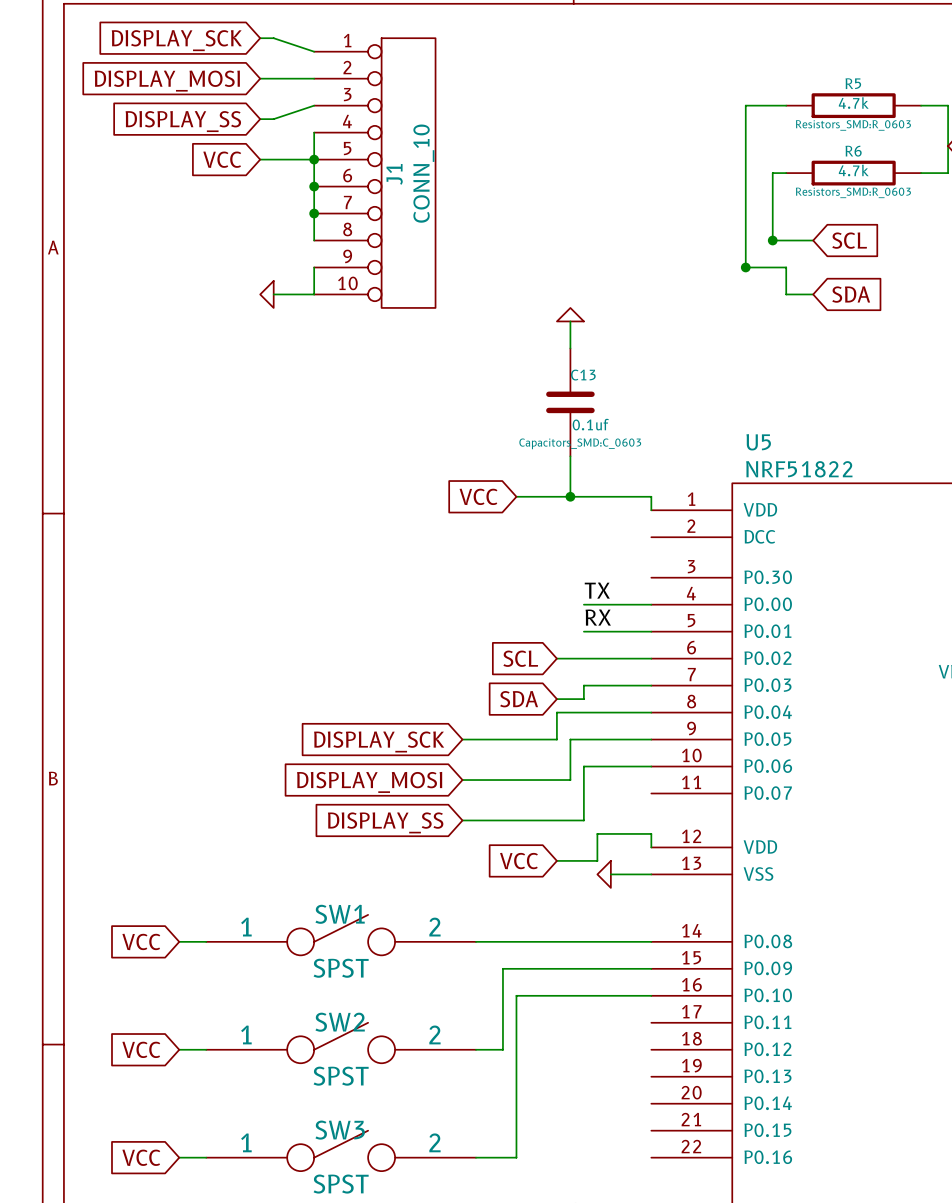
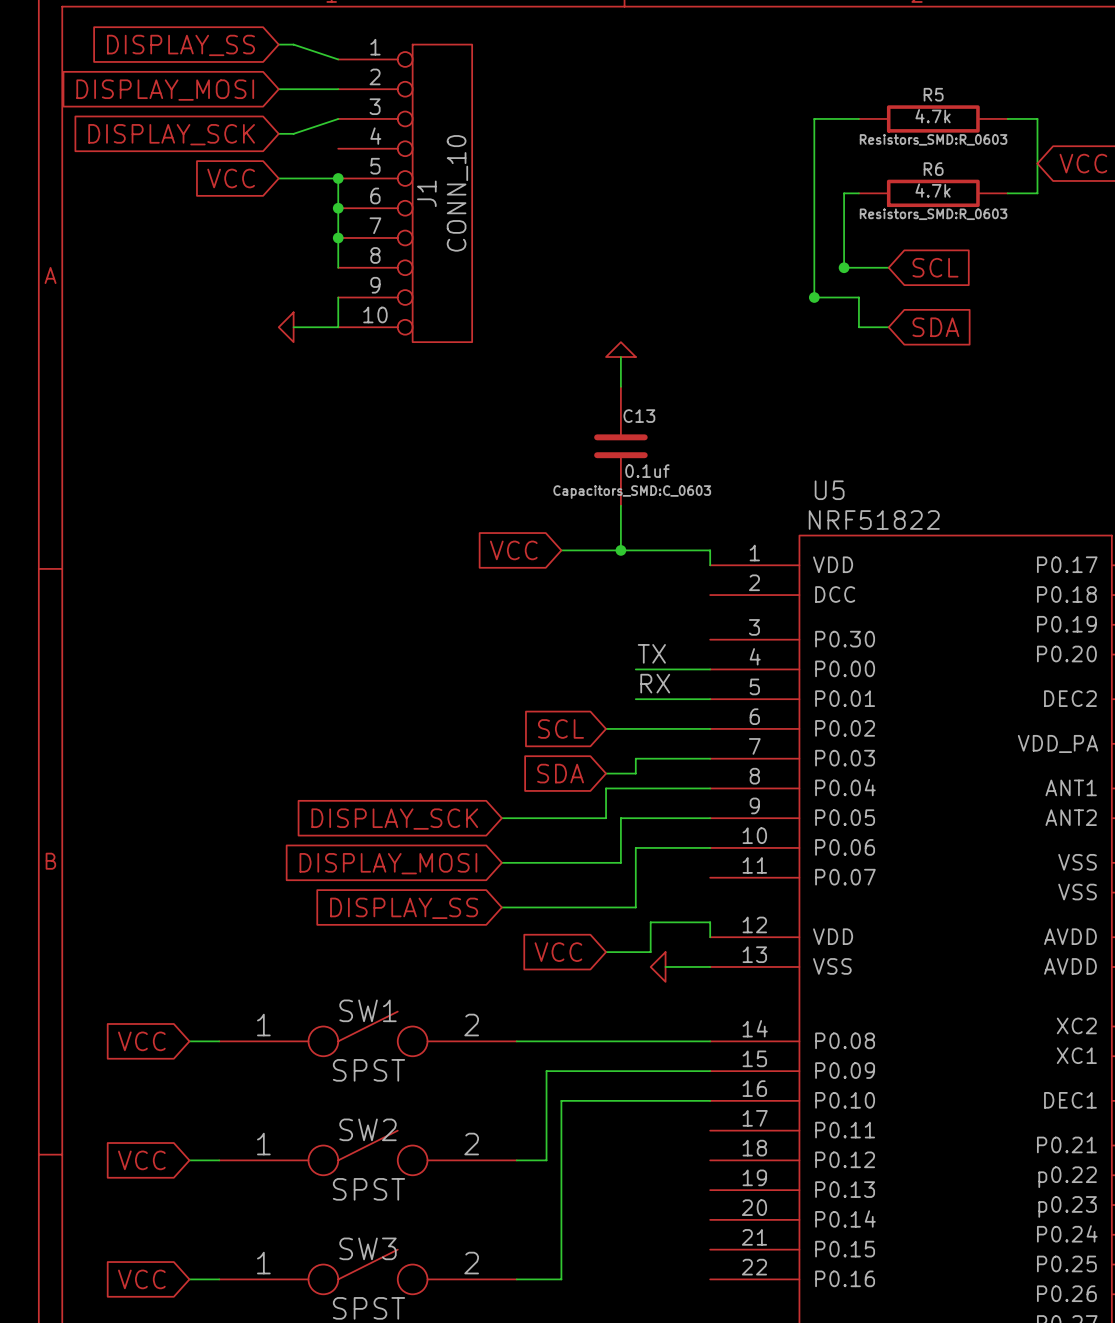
global label: DISPLAY_SCK (176, 40) -> DISPLAY_SS (180, 45)
global label: DISPLAY_SS (183, 121) -> DISPLAY_SCK (171, 134)
wire: (314, 132) (314, 159) -> none

